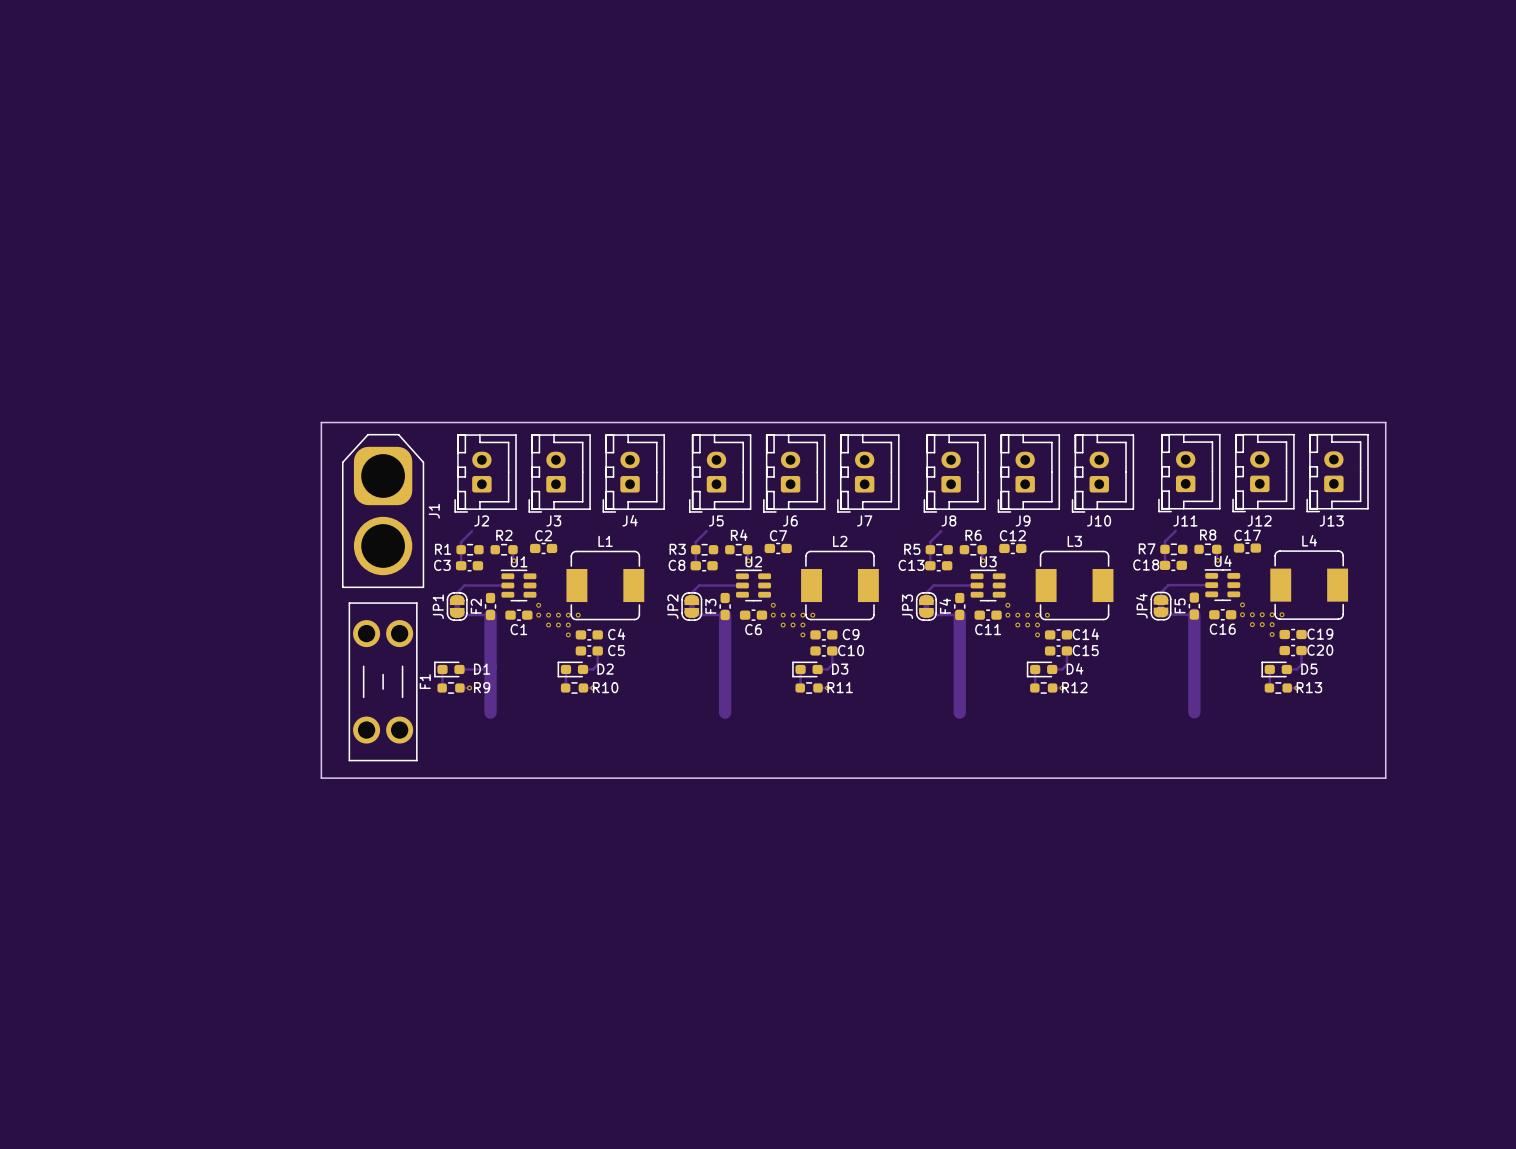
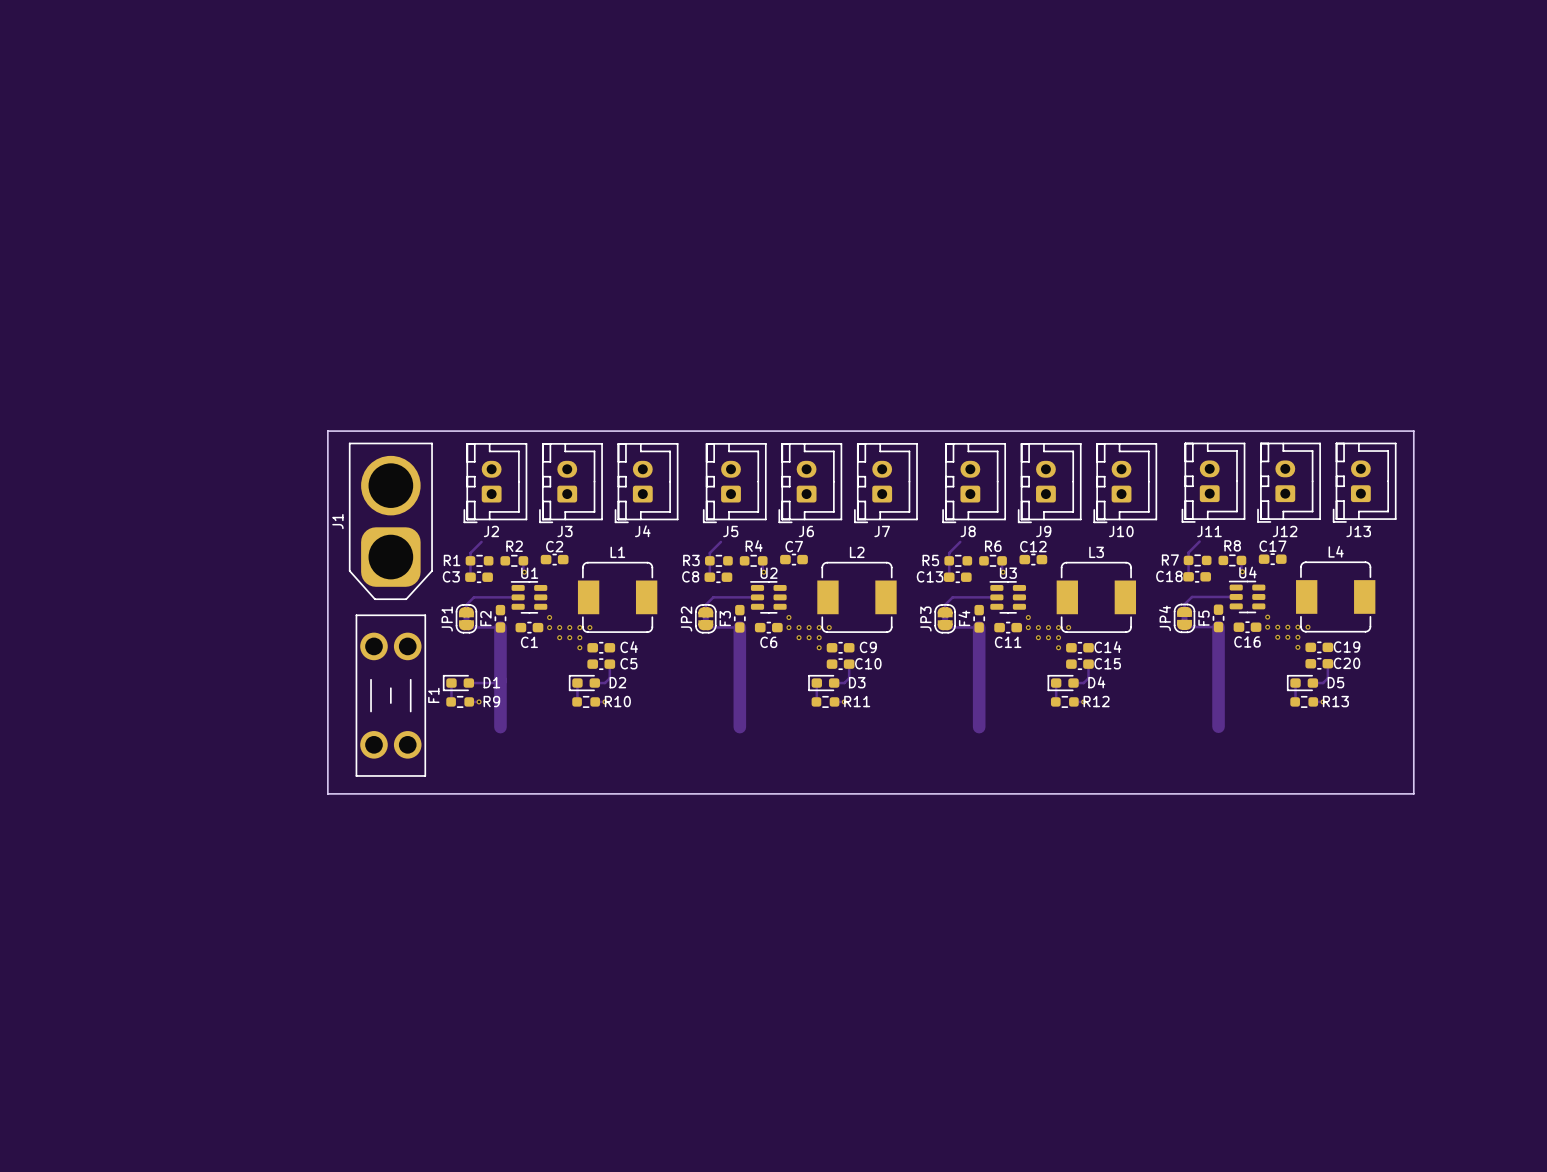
J1 rotation: 0° (383, 510) -> 180° (390, 521)

